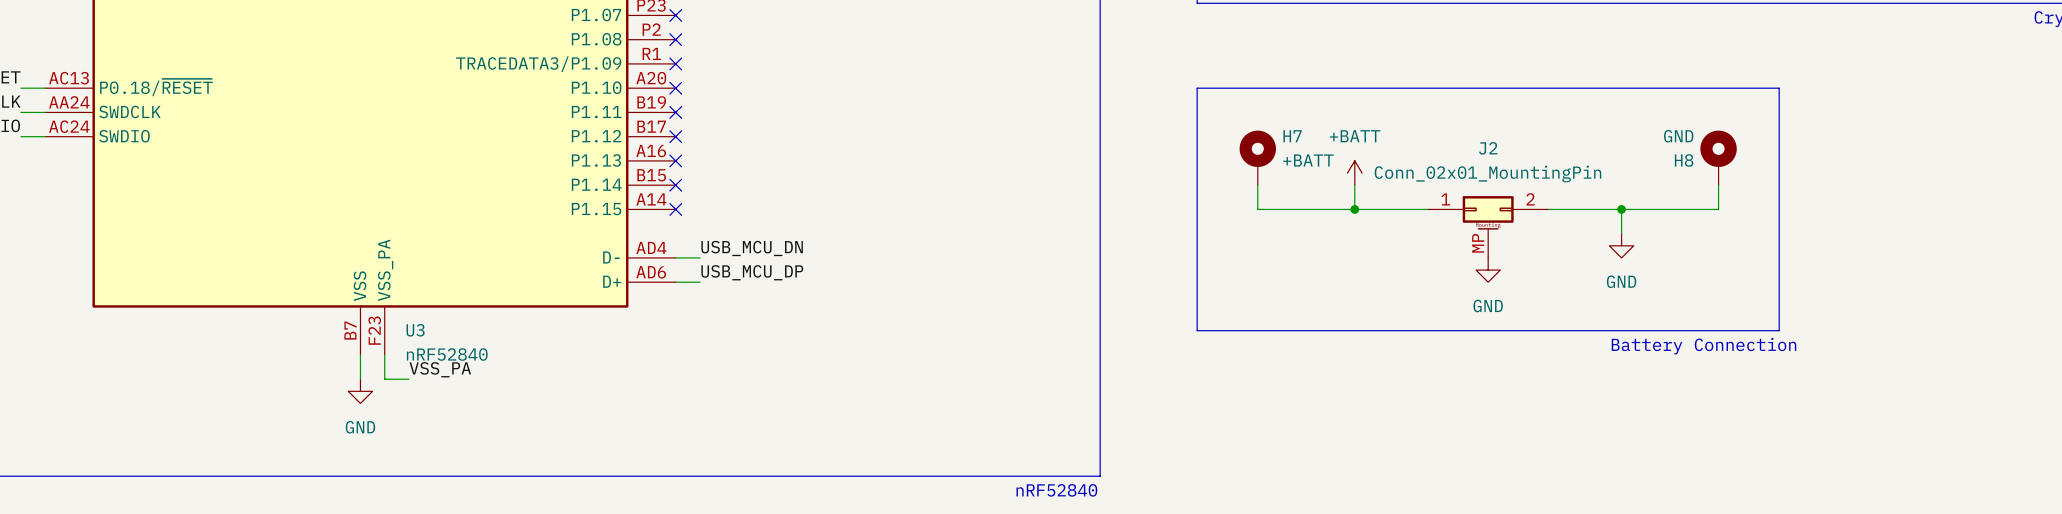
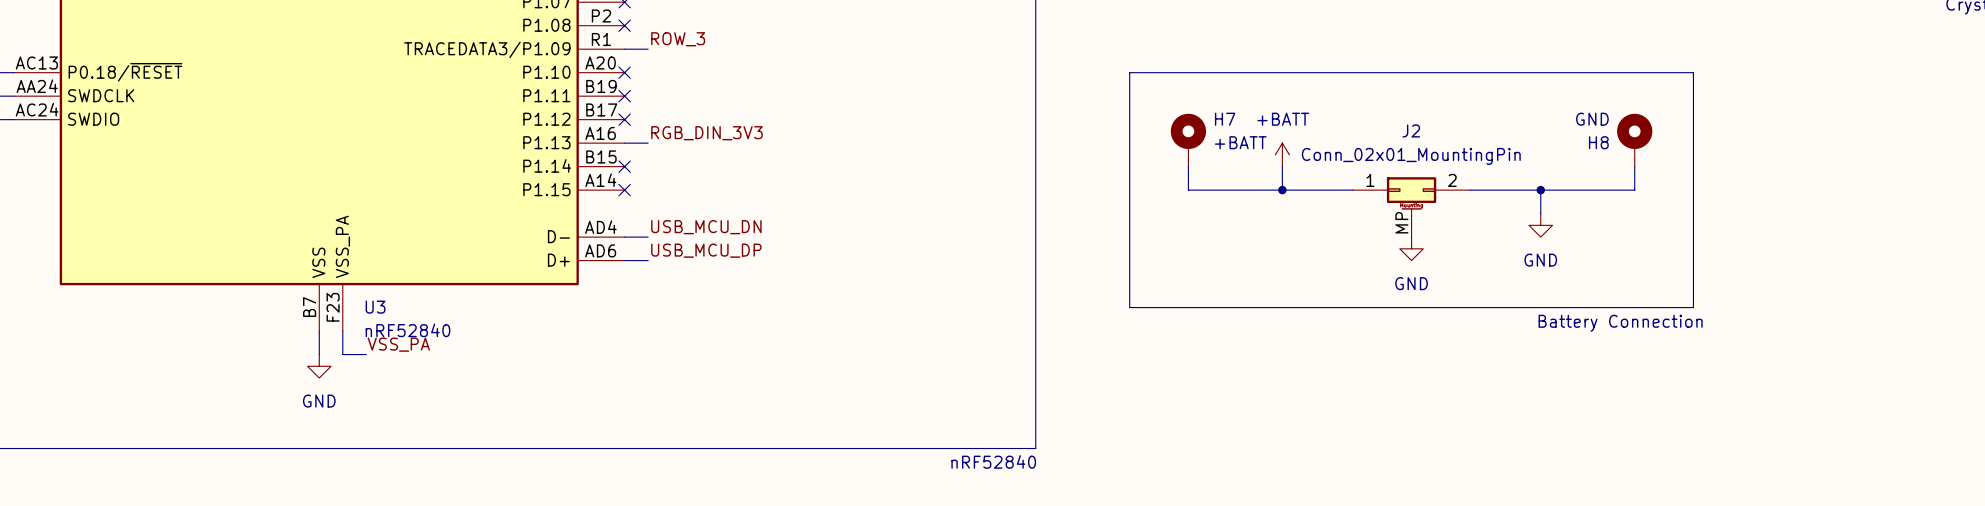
label: none -> ROW_3 (678, 39)
wire: none -> (624, 49) (648, 49)
no-connect mark: (675, 63) -> none
label: none -> RGB_DIN_3V3 (706, 133)
wire: none -> (624, 143) (648, 143)
no-connect mark: (675, 160) -> none

